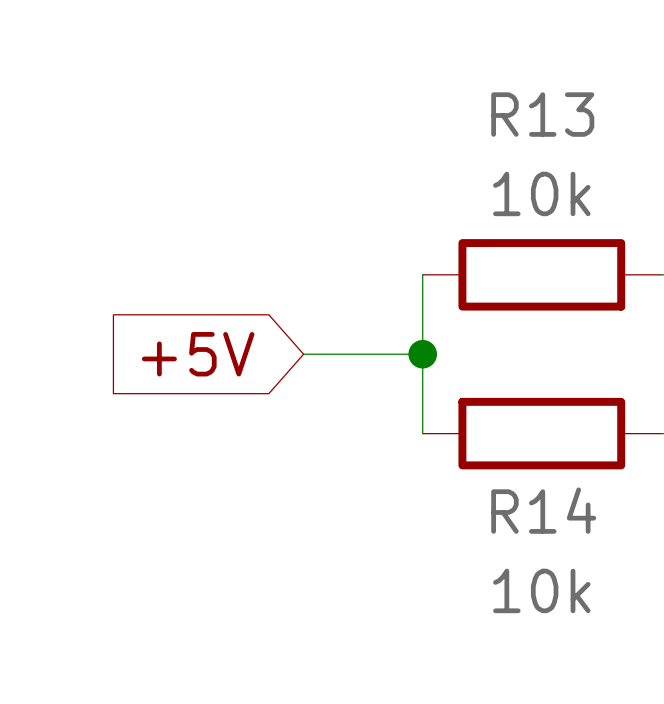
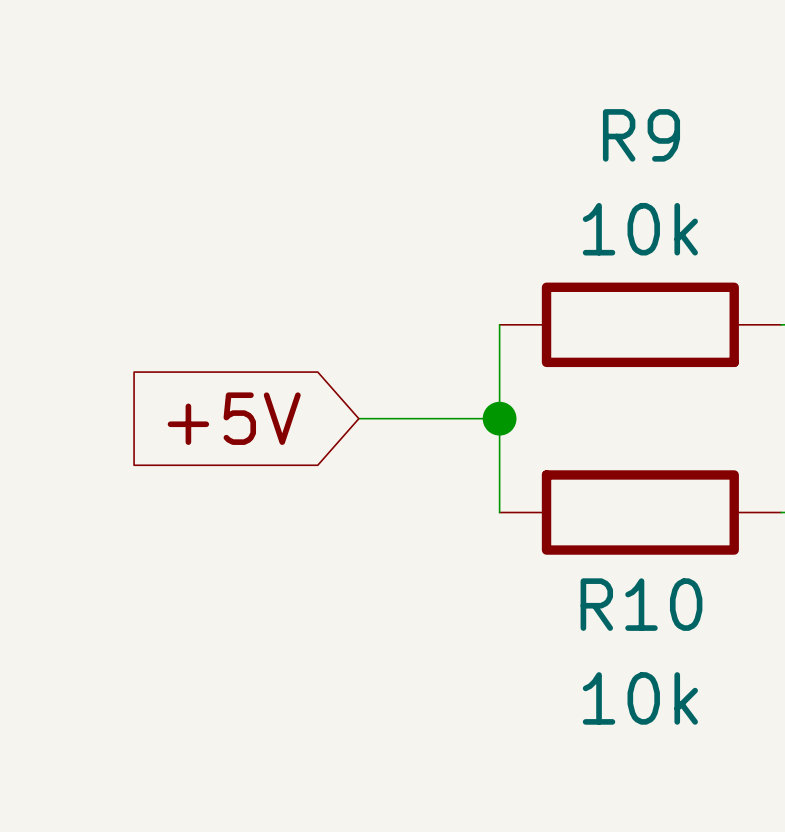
R13 name: R13 (542, 114) -> R9 (641, 135)
R14 name: R14 (543, 510) -> R10 (641, 604)

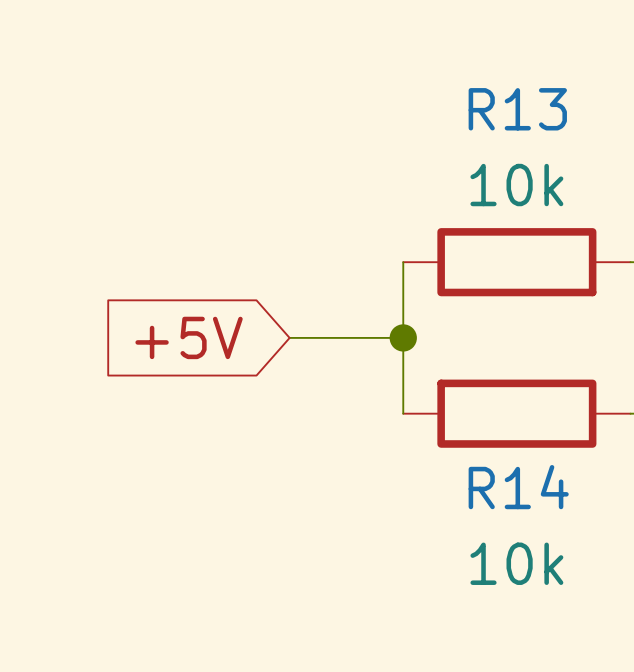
R9 name: R9 (641, 135) -> R13 (517, 109)
R10 name: R10 (641, 604) -> R14 (518, 487)

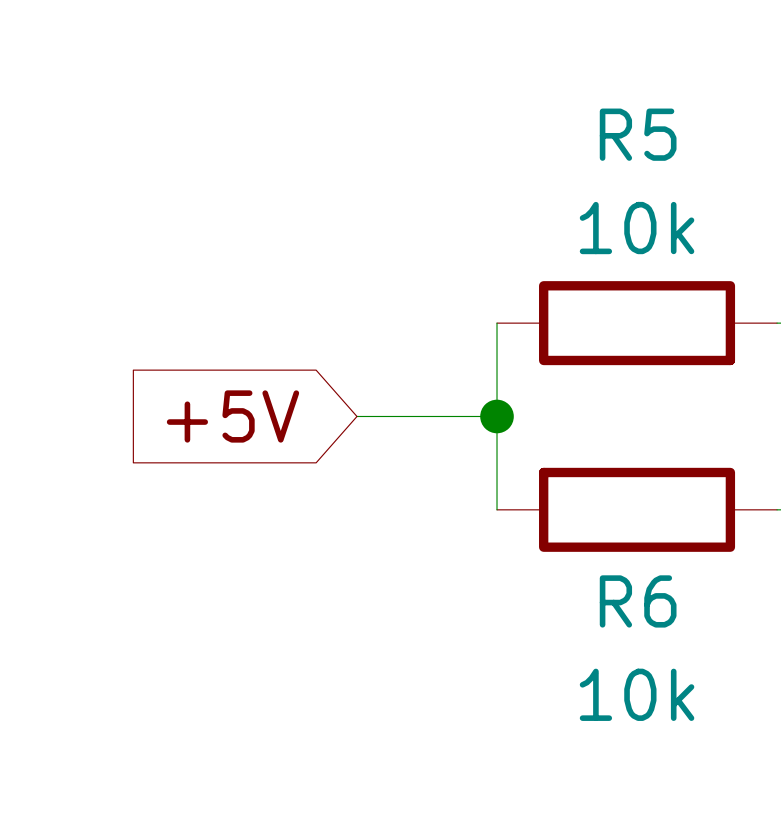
R13 name: R13 (517, 109) -> R5 (638, 134)
R14 name: R14 (518, 487) -> R6 (638, 601)

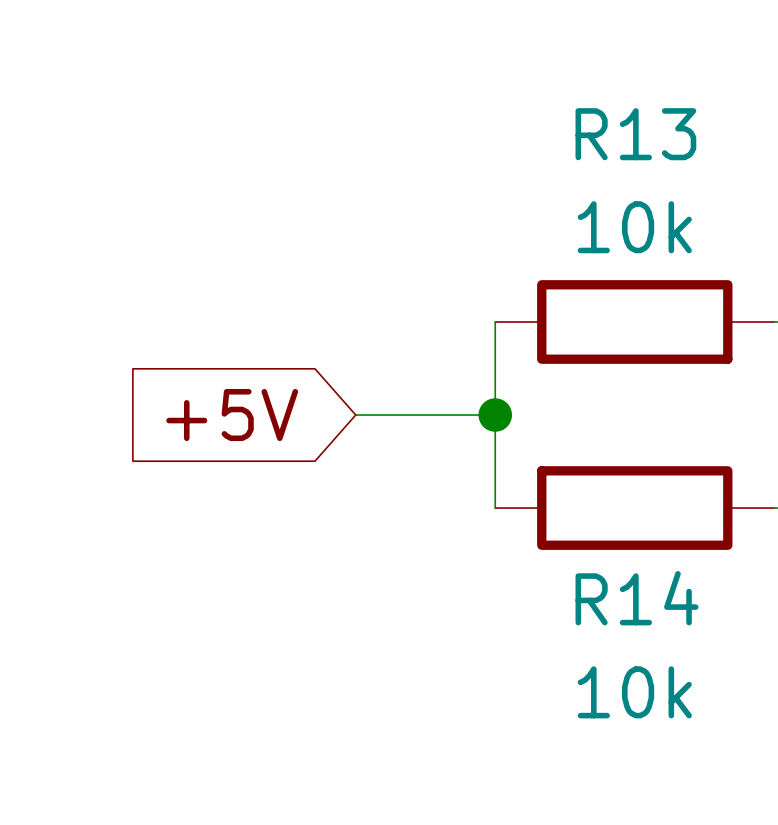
R5 name: R5 (638, 134) -> R13 (635, 134)
R6 name: R6 (638, 601) -> R14 (637, 598)

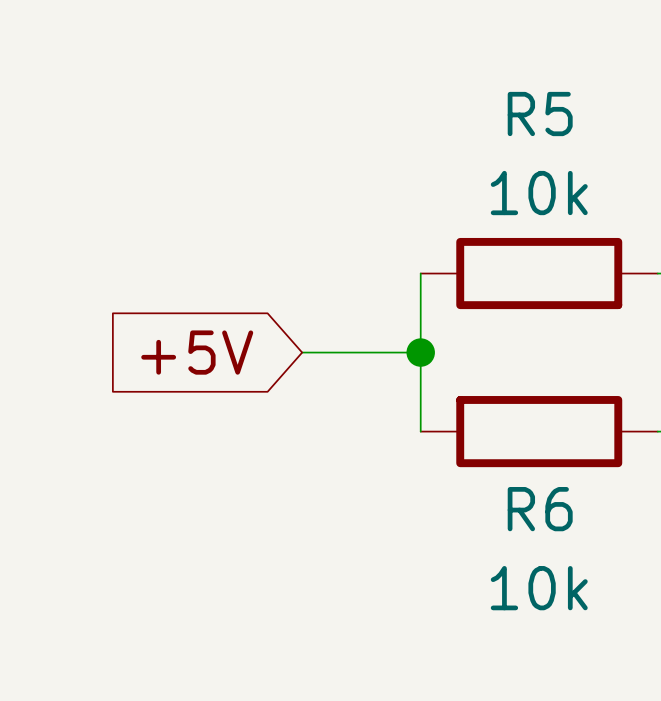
R13 name: R13 (635, 134) -> R5 (540, 114)
R14 name: R14 (637, 598) -> R6 (540, 509)

